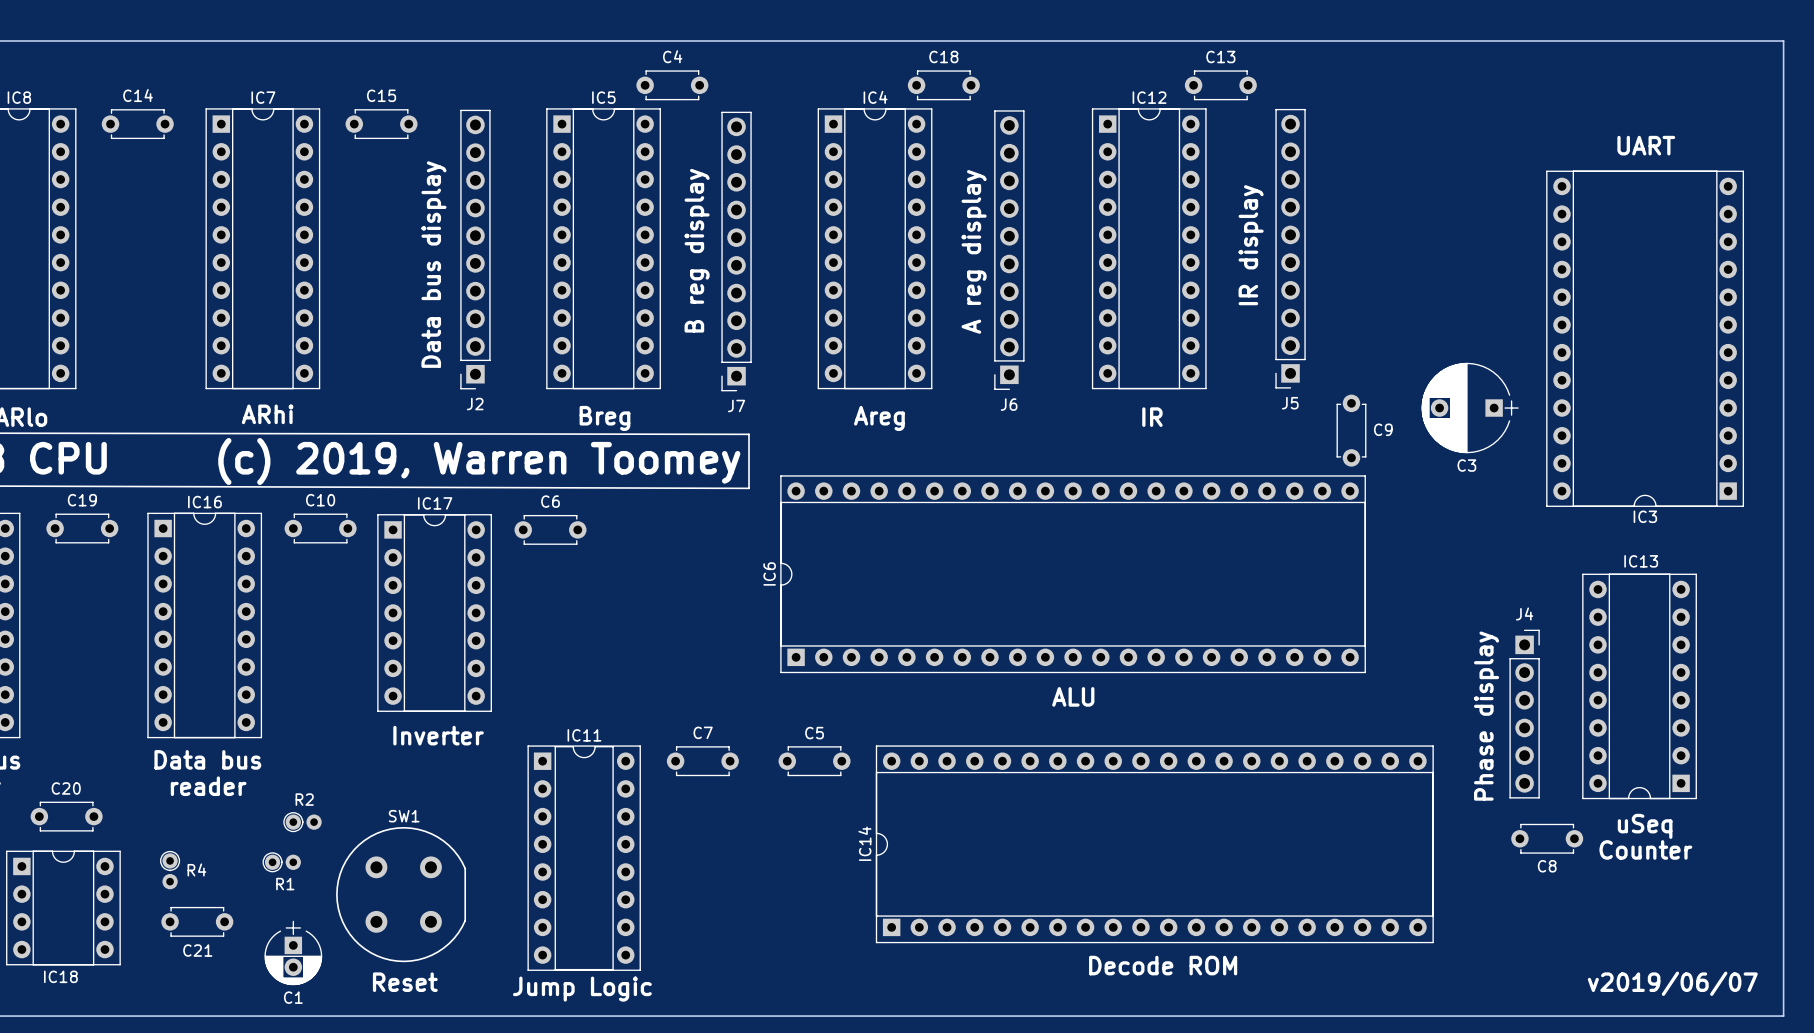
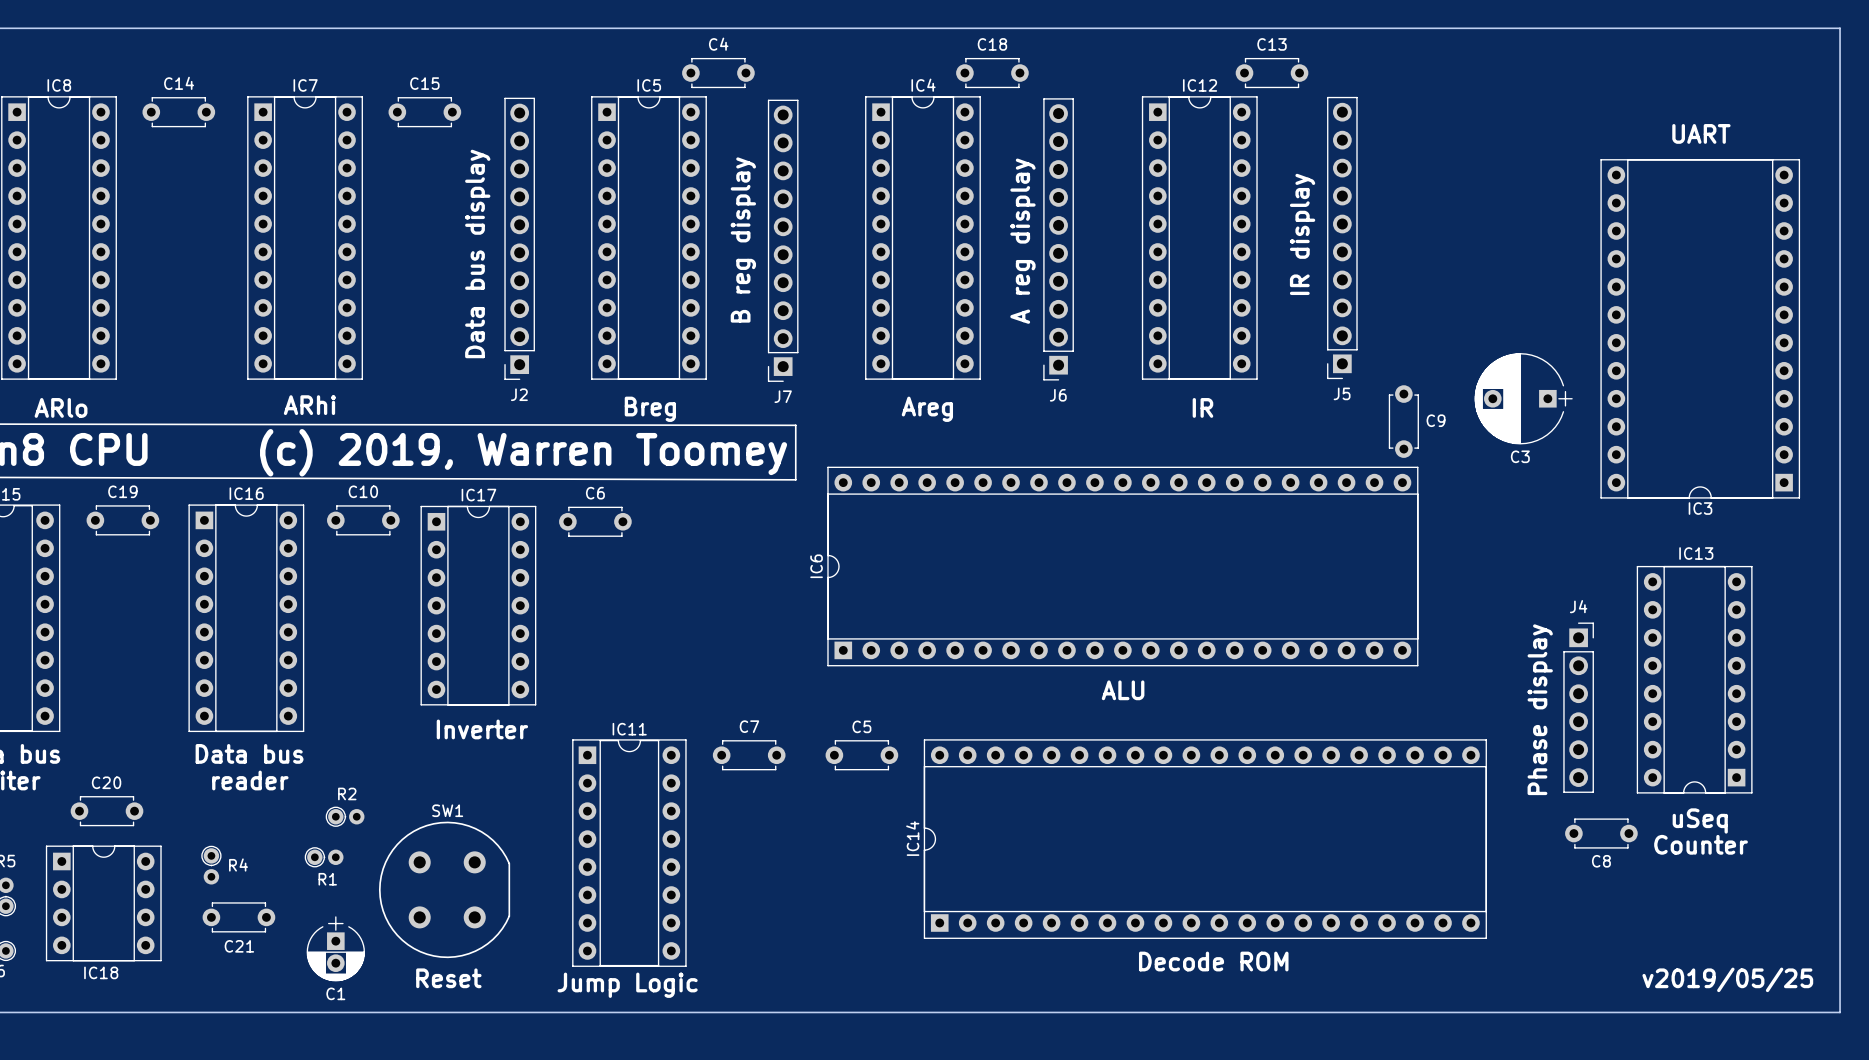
text: v2019/06/07 (1672, 983) -> v2019/05/25 (1727, 979)

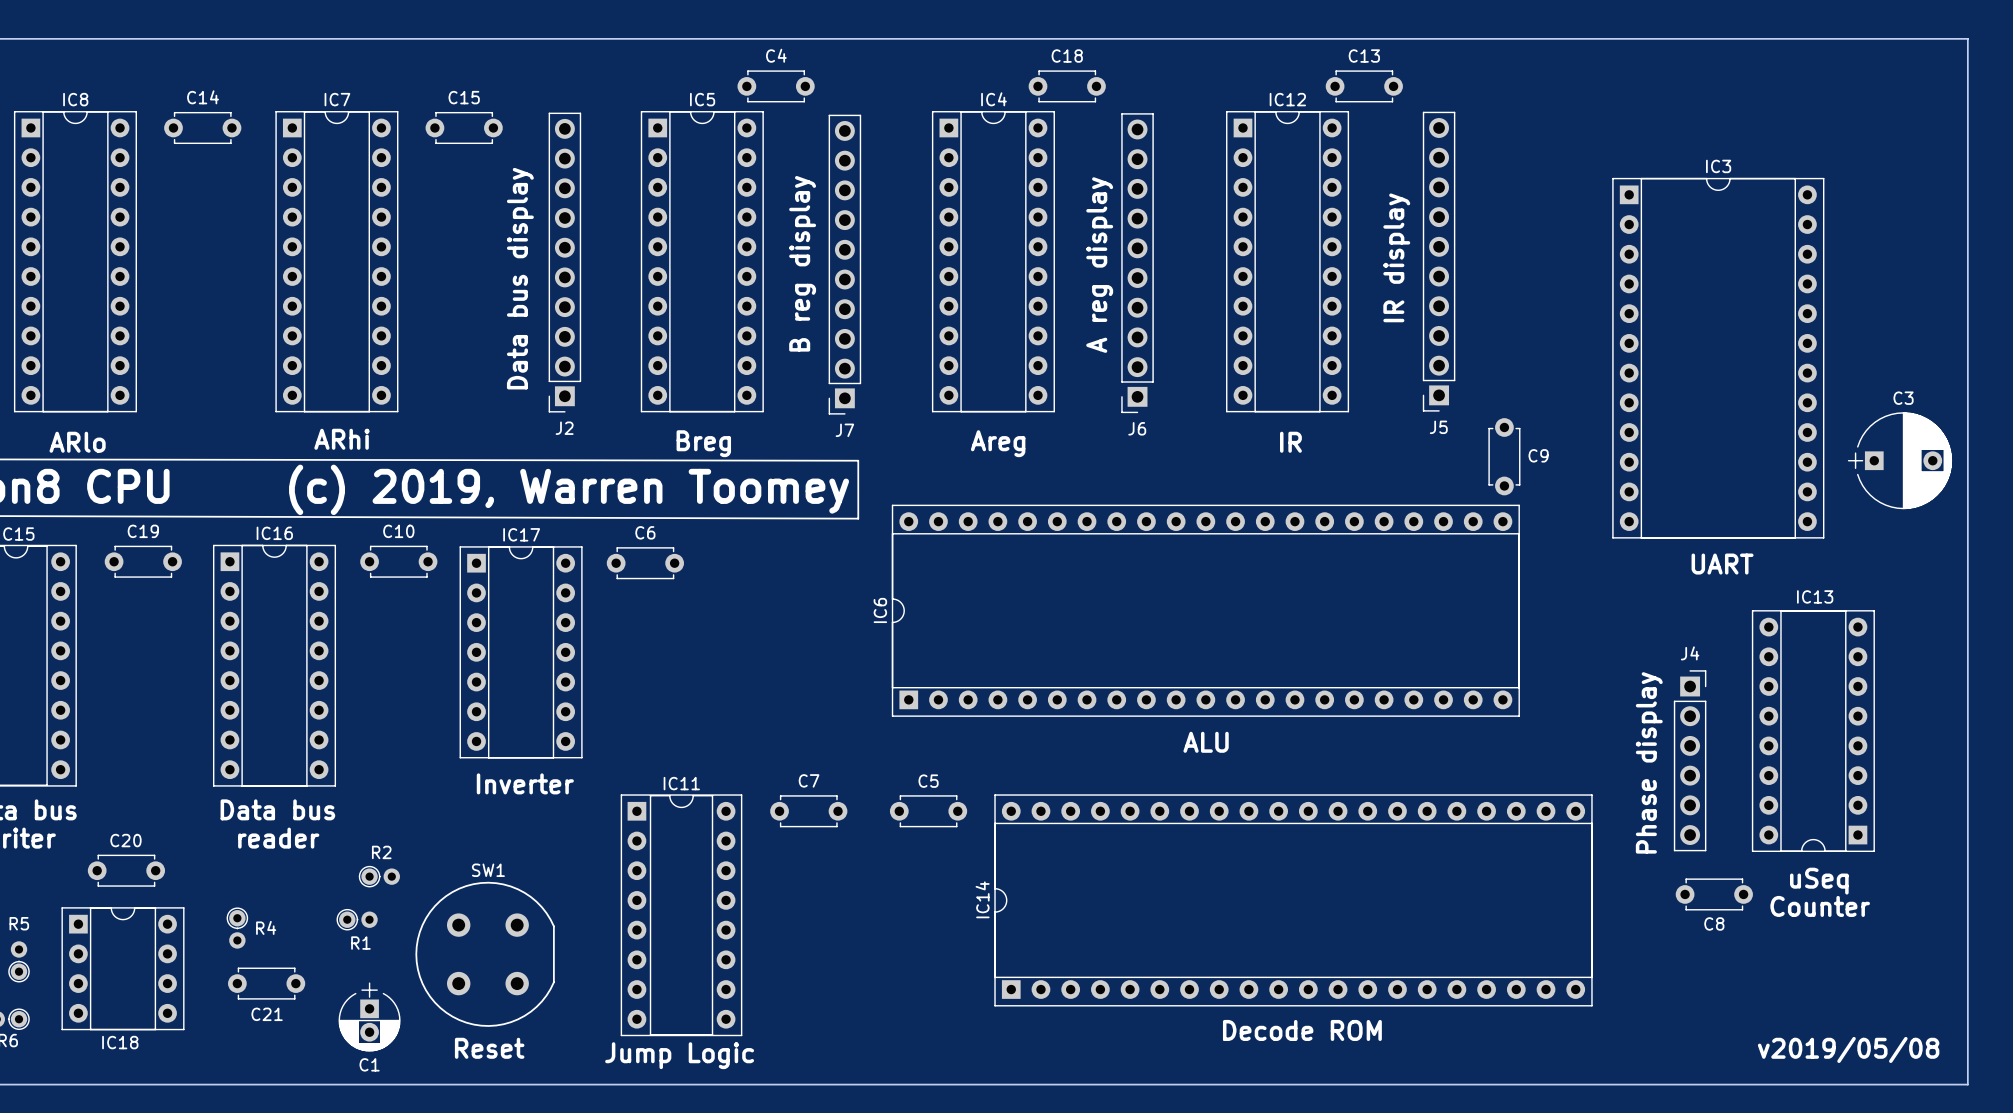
text: UART (1701, 133) -> none
IC3 rotation: 0° (1700, 328) -> 180° (1718, 358)
C3 rotation: 0° (1523, 398) -> 180° (1899, 460)
C3 position: (1523, 398) -> (1899, 460)
text: none -> UART (1722, 564)
text: v2019/05/25 (1727, 979) -> v2019/05/08 (1848, 1049)

